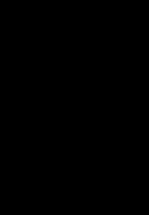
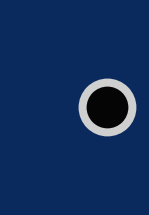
part: none -> (107, 107)

